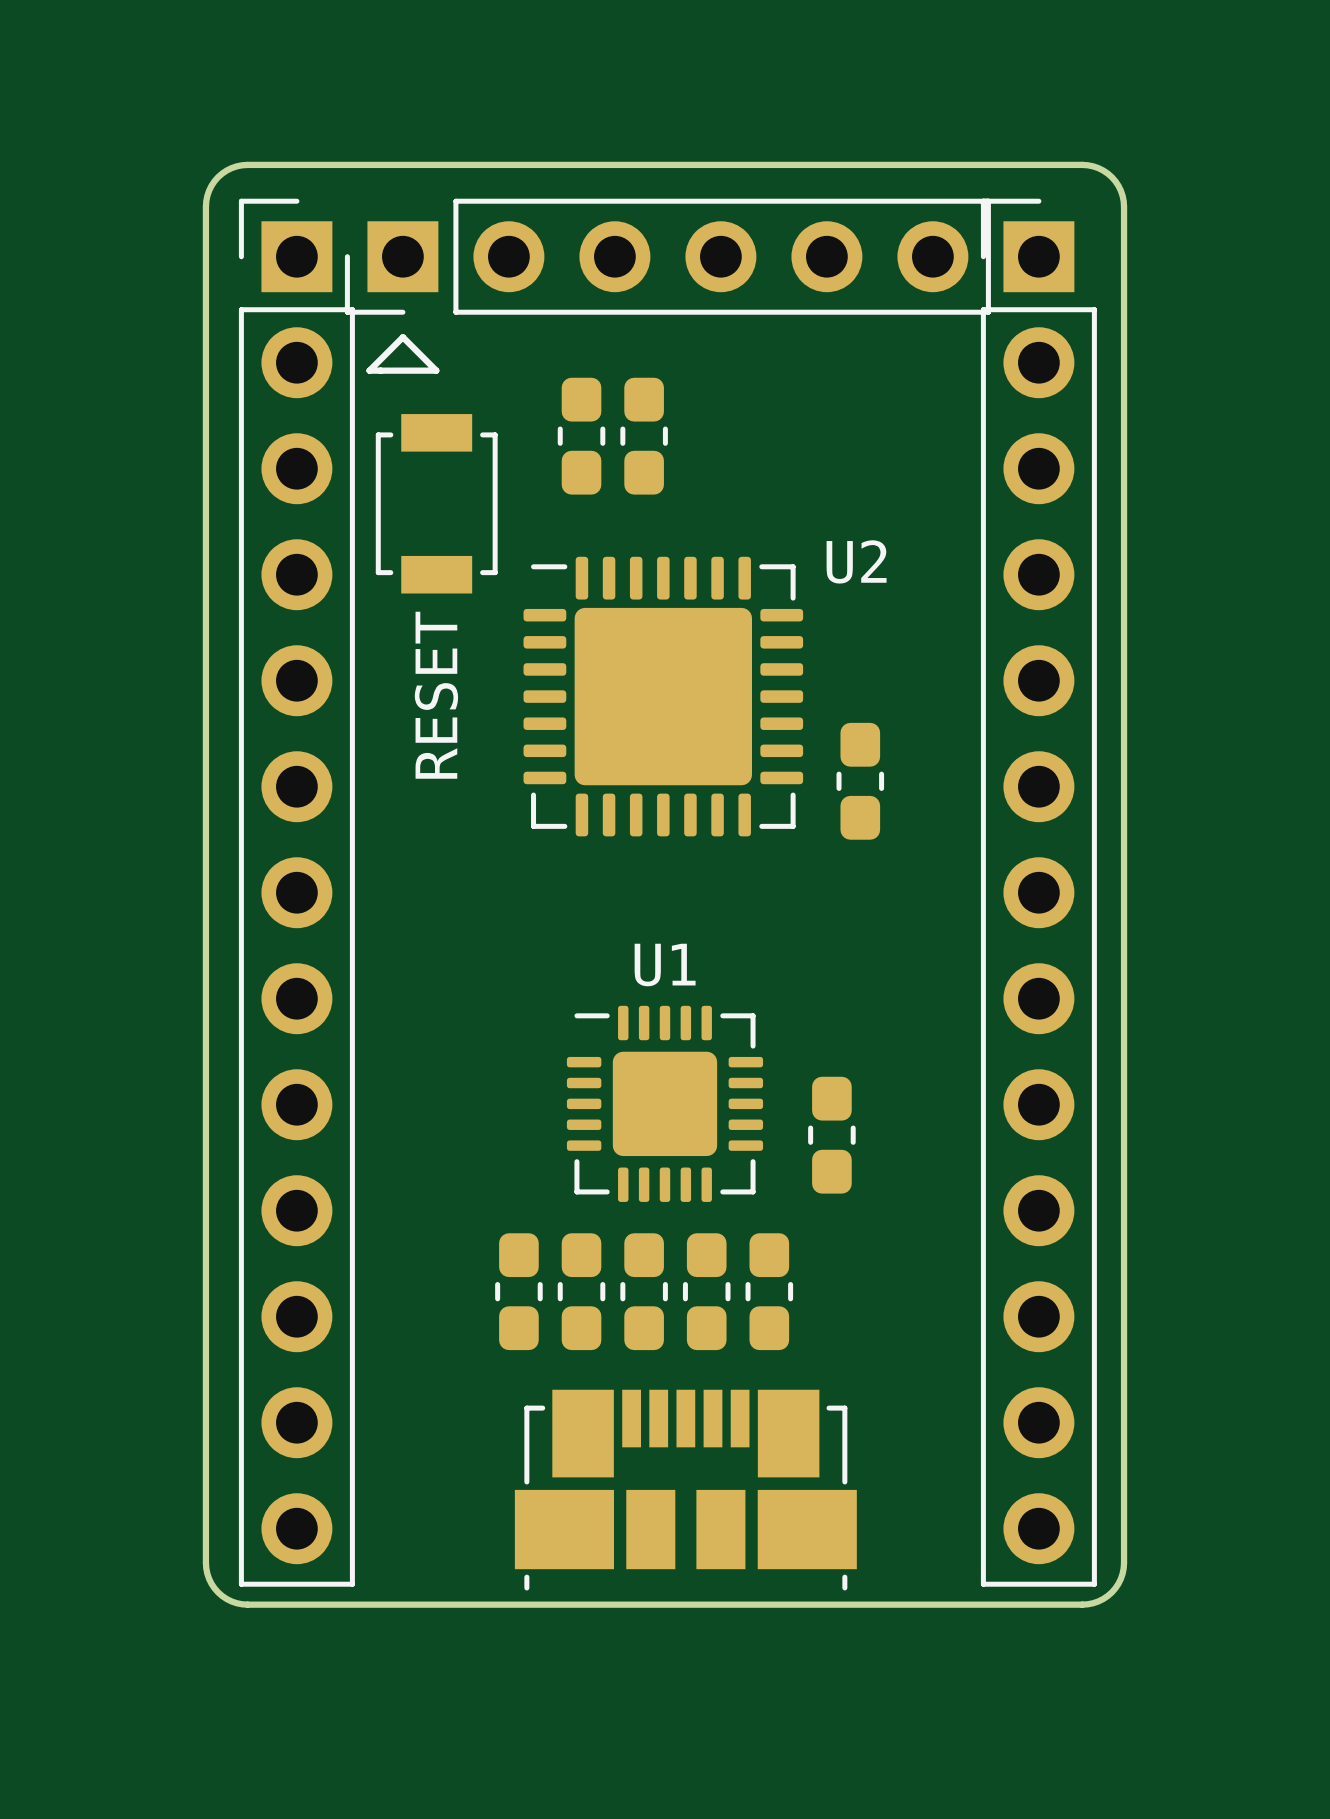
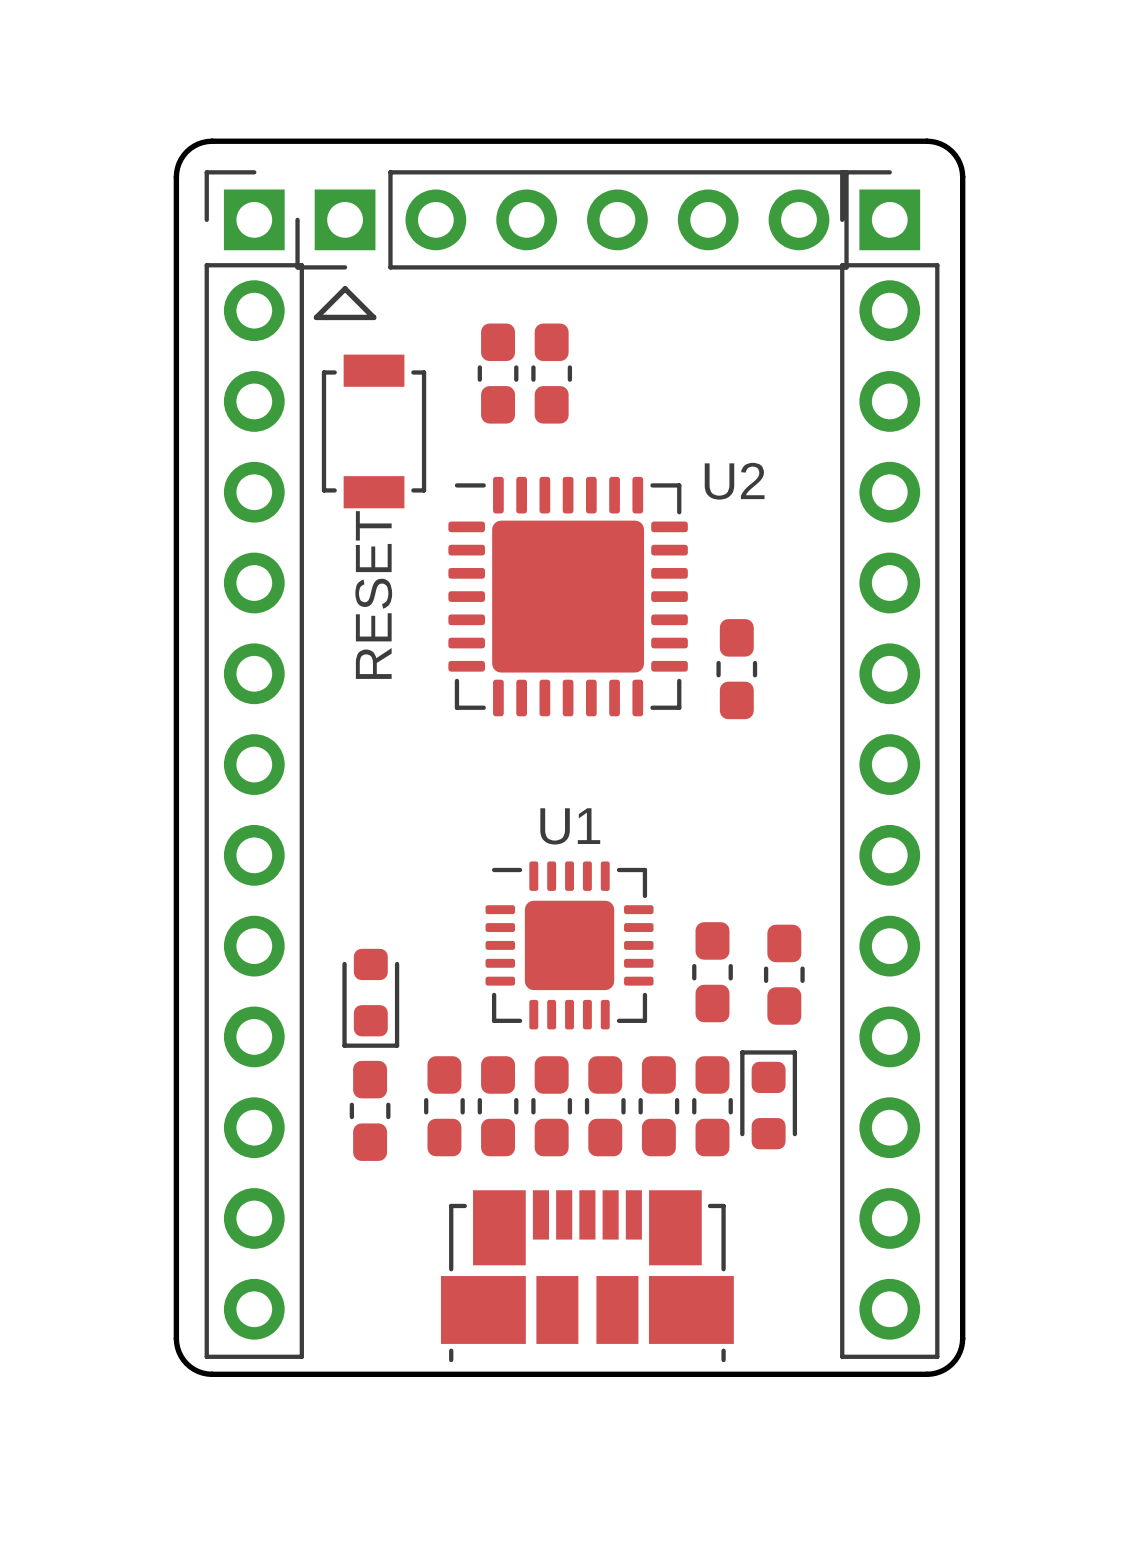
part: none -> (784, 974)
part: none -> (370, 998)
part: none -> (768, 1099)
part: none -> (712, 1106)
part: none -> (370, 1110)

